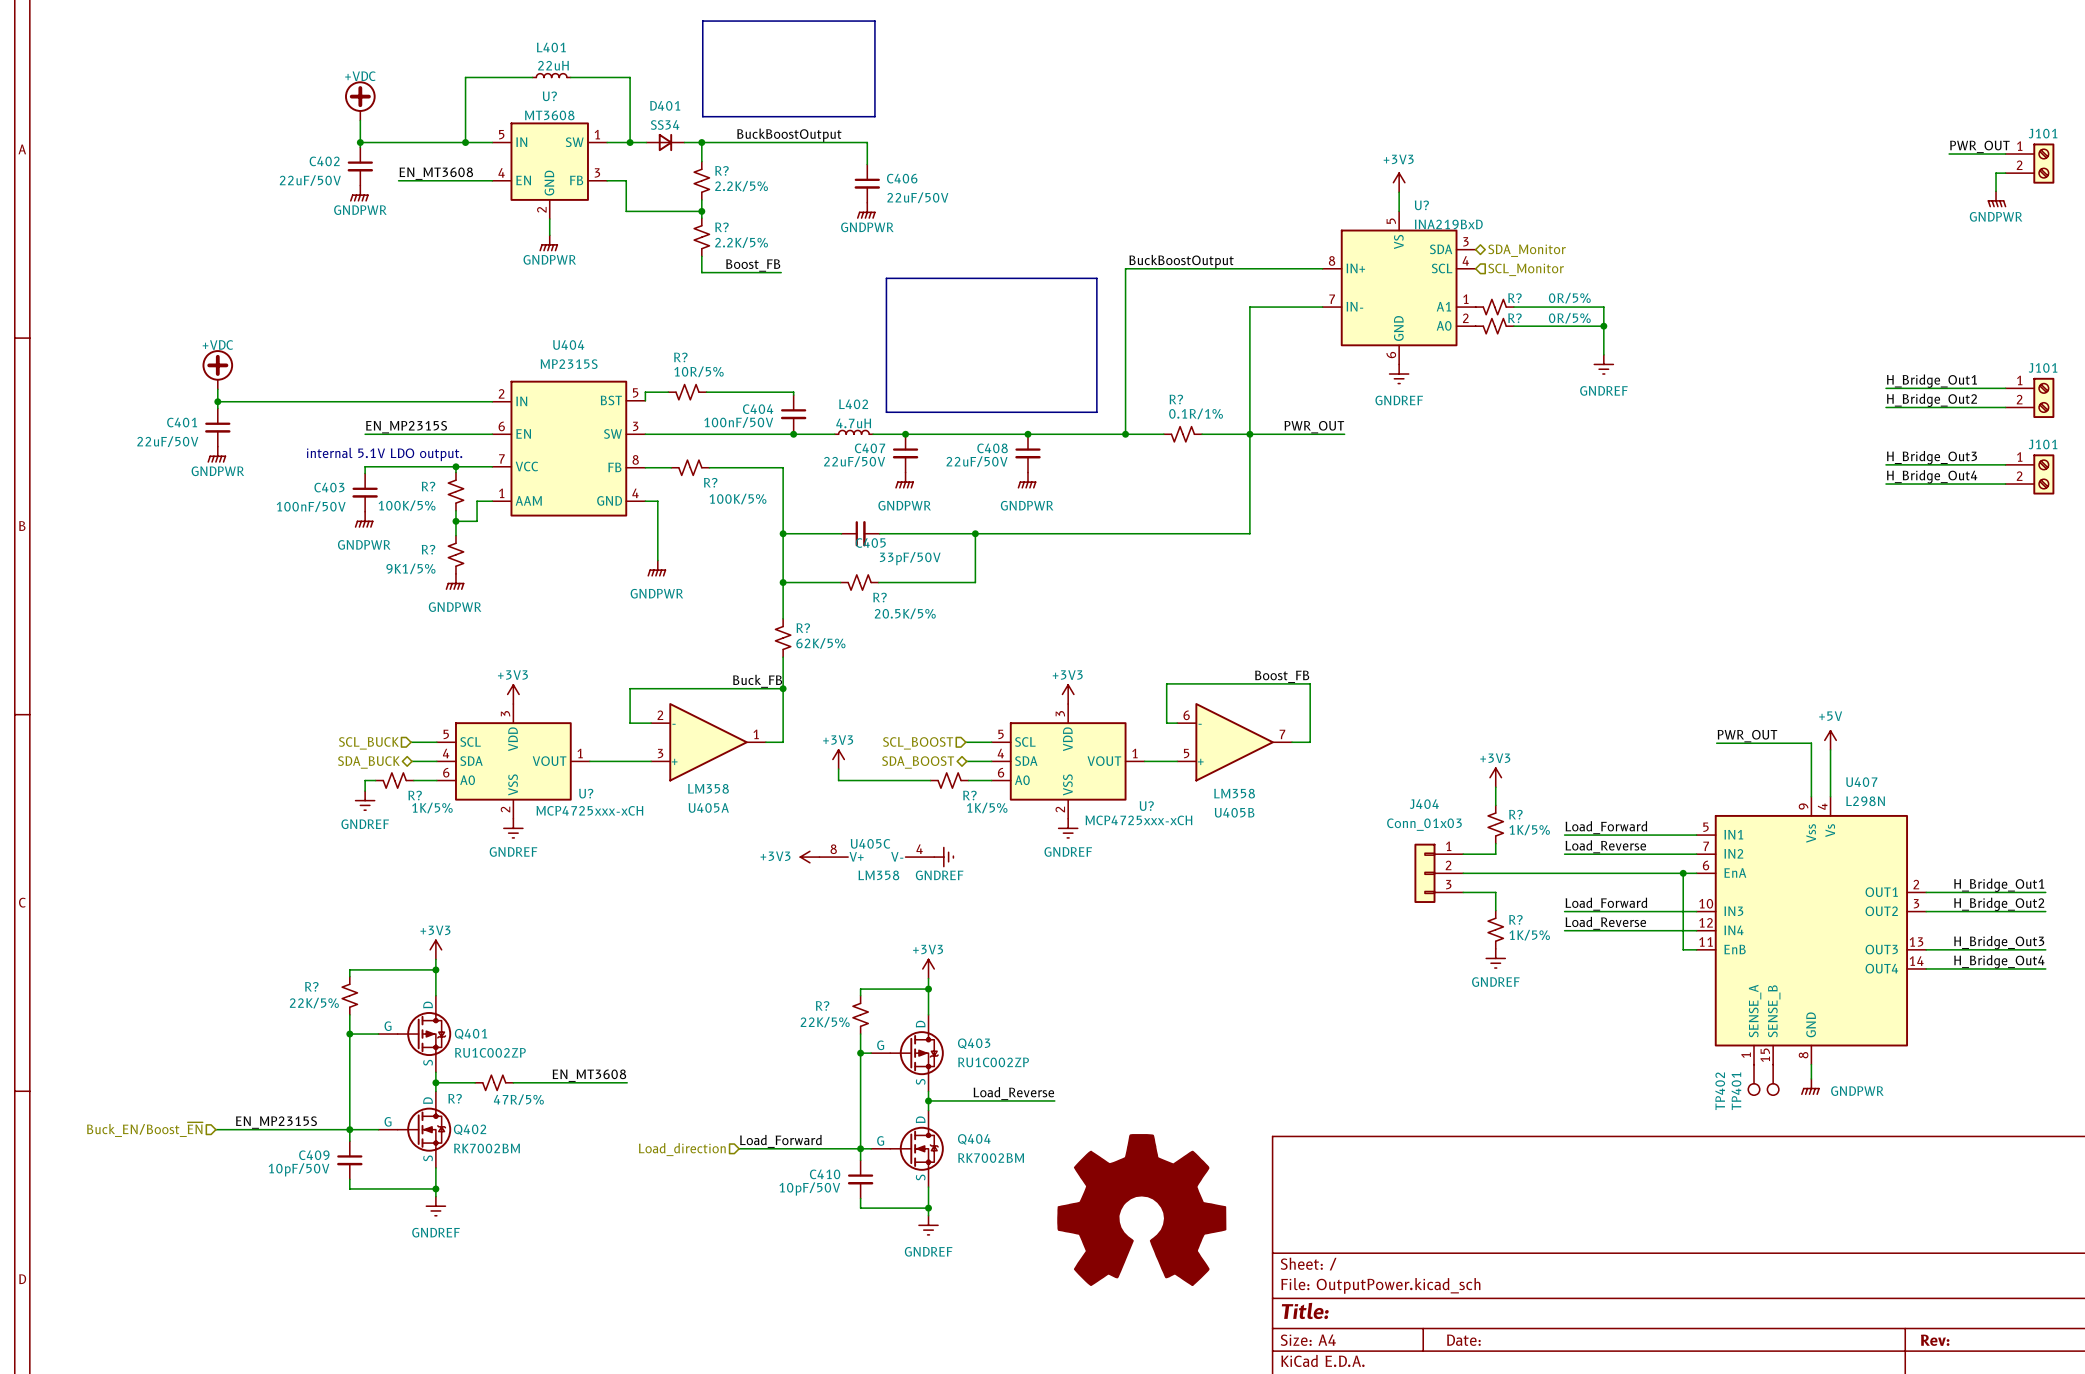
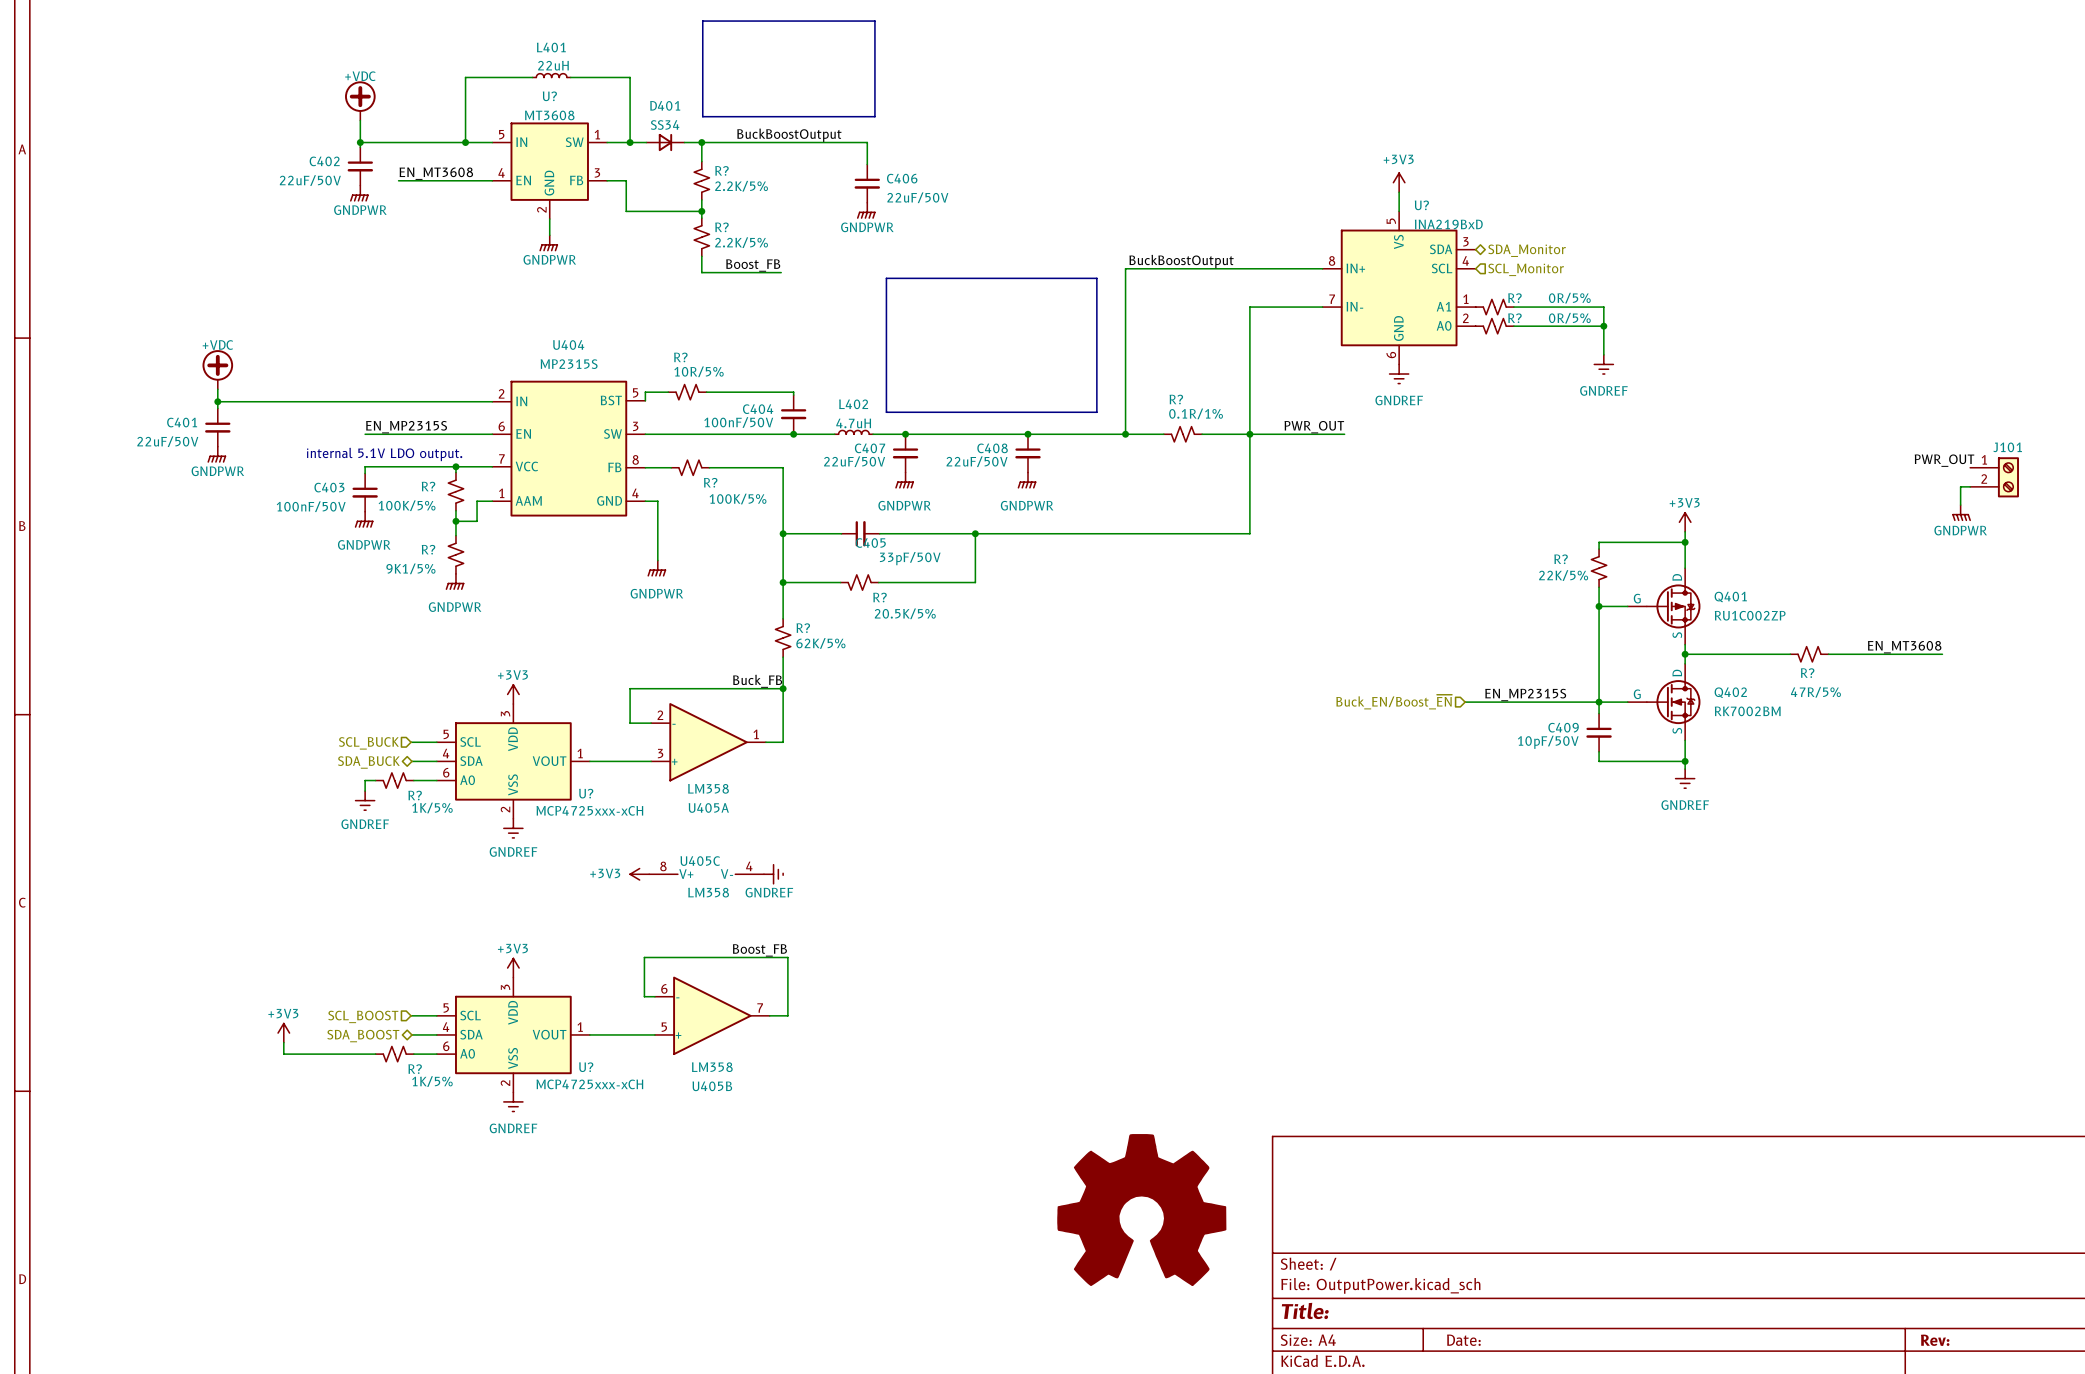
label: PWR_OUT (1979, 146) -> none
wire: (1949, 154) (2005, 154) -> none
J101: (2029, 163) -> none
wire: (2005, 173) (1996, 173) (1996, 191) -> none
power symbol: GNDPWR (1996, 199) -> none
label: H_Bridge_Out1 (1931, 381) -> none
wire: (1886, 388) (2005, 388) -> none
J101: (2029, 397) -> none
label: H_Bridge_Out2 (1931, 400) -> none
wire: (1886, 407) (2005, 407) -> none
label: H_Bridge_Out3 (1931, 457) -> none
label: none -> PWR_OUT (1944, 460)
wire: (1886, 464) (2005, 464) -> none
J101 position: (2029, 474) -> (1994, 477)
label: H_Bridge_Out4 (1932, 476) -> none
wire: (1886, 484) (2005, 484) -> none
wire: none -> (1970, 486) (1960, 486) (1960, 505)
power symbol: none -> GNDPWR (1961, 513)
power symbol: none -> +3V3 (1685, 522)
wire: none -> (1685, 531) (1685, 568)
wire: none -> (1685, 542) (1599, 542) (1599, 549)
junction: none -> (1685, 542)
R?: none -> 22K/5% (1599, 568)
wire: none -> (1599, 587) (1599, 713)
wire: none -> (1599, 606) (1627, 606)
junction: none -> (1599, 606)
wire: none -> (1685, 644) (1685, 663)
label: none -> EN_MT3608 (1904, 647)
wire: none -> (1685, 654) (1790, 654)
junction: none -> (1685, 654)
R?: none -> 47R/5% (1809, 654)
wire: none -> (1828, 654) (1942, 654)
label: Boost_FB (1282, 676) -> none
power symbol: +3V3 (1068, 694) -> none
label: none -> EN_MP2315S (1525, 694)
hierarchical label: none -> Buck_EN/Boost_~{EN} (1394, 702)
wire: none -> (1465, 702) (1627, 702)
junction: none -> (1599, 702)
wire: (1177, 723) (1166, 723) (1166, 683) (1310, 683) (1310, 742) (1292, 742) -> none
label: PWR_OUT (1747, 736) -> none
wire: none -> (1685, 740) (1685, 769)
power symbol: +5V (1830, 740) -> none
wire: (965, 742) (991, 742) -> none
U405B position: (1234, 742) -> (712, 1015)
hierarchical label: SCL_BOOST (918, 743) -> none
wire: (1716, 743) (1811, 743) (1811, 796) -> none
wire: (1830, 749) (1830, 796) -> none
wire: none -> (1599, 751) (1599, 761) (1685, 761)
power symbol: +3V3 (838, 759) -> none
wire: (966, 761) (991, 761) -> none
U?: MCP4725xxx-xCH (1068, 761) -> none
wire: (1144, 761) (1177, 761) -> none
junction: none -> (1685, 761)
hierarchical label: SDA_BOOST (918, 762) -> none
wire: (838, 769) (838, 780) (930, 780) -> none
power symbol: +3V3 (1495, 777) -> none
power symbol: none -> GNDREF (1685, 778)
R?: 1K/5% (949, 780) -> none
wire: (968, 780) (991, 780) -> none
wire: (1495, 787) (1495, 805) -> none
R?: 1K/5% (1495, 824) -> none
label: Load_Forward (1606, 827) -> none
power symbol: GNDREF (1068, 828) -> none
wire: (1564, 835) (1696, 835) -> none
wire: (1495, 843) (1495, 854) (1463, 854) -> none
label: Load_Reverse (1605, 846) -> none
wire: (1564, 854) (1696, 854) -> none
power symbol: +3V3 (809, 857) -> none
U405C position: (876, 857) -> (706, 874)
power symbol: GNDREF (943, 857) -> none
J404: Conn_01x03 (1438, 873) -> none
wire: (1463, 873) (1696, 873) -> none
wire: (1683, 873) (1683, 949) (1696, 949) -> none
junction: (1683, 873) -> none
power symbol: none -> +3V3 (639, 874)
power symbol: none -> GNDREF (773, 874)
label: H_Bridge_Out1 (1999, 885) -> none
wire: (1463, 892) (1495, 892) (1495, 910) -> none
wire: (1926, 892) (2045, 892) -> none
label: Load_Forward (1606, 904) -> none
label: H_Bridge_Out2 (1999, 904) -> none
wire: (1564, 911) (1696, 911) -> none
wire: (1926, 911) (2045, 911) -> none
label: Load_Reverse (1605, 923) -> none
R?: 1K/5% (1495, 929) -> none
wire: (1564, 930) (1696, 930) -> none
U407: L298N (1811, 930) -> none
label: H_Bridge_Out3 (1999, 942) -> none
power symbol position: +3V3 (435, 949) -> +3V3 (513, 968)
wire: (1926, 949) (2045, 949) -> none
label: none -> Boost_FB (759, 950)
power symbol: GNDREF (1495, 958) -> none
wire: (435, 959) (435, 995) -> none
label: H_Bridge_Out4 (1999, 961) -> none
power symbol: +3V3 (928, 968) -> none
wire: (1926, 968) (2045, 968) -> none
wire: (435, 969) (349, 969) (349, 976) -> none
junction: (435, 969) -> none
wire: (928, 978) (928, 1014) -> none
wire: (928, 989) (860, 989) (860, 995) -> none
junction: (928, 989) -> none
R?: 22K/5% (349, 995) -> none
wire: none -> (654, 996) (644, 996) (644, 957) (787, 957) (787, 1015) (769, 1015)
wire: (349, 1014) (349, 1141) -> none
R?: 22K/5% (860, 1014) -> none
wire: none -> (411, 1015) (436, 1015)
hierarchical label: none -> SCL_BOOST (363, 1016)
power symbol: none -> +3V3 (283, 1033)
wire: (349, 1034) (378, 1034) -> none
junction: (349, 1034) -> none
Q401 position: (414, 1034) -> (1664, 606)
Q401 name position: Q401 (470, 1034) -> Q401 (1730, 596)
U?: none -> MCP4725xxx-xCH (513, 1034)
wire: none -> (589, 1034) (654, 1034)
wire: (860, 1034) (860, 1160) -> none
hierarchical label: none -> SDA_BOOST (363, 1036)
wire: none -> (283, 1042) (283, 1054) (375, 1054)
Q401 value position: RU1C002ZP (490, 1052) -> RU1C002ZP (1750, 615)
wire: (860, 1053) (871, 1053) -> none
junction: (860, 1053) -> none
Q403: RU1C002ZP (907, 1053) -> none
R?: none -> 1K/5% (394, 1054)
wire: (1811, 1064) (1811, 1078) -> none
wire: (435, 1072) (435, 1091) -> none
label: EN_MT3608 (589, 1075) -> none
TP402: (1754, 1079) -> none
TP401: (1773, 1079) -> none
wire: (435, 1082) (475, 1082) -> none
junction: (435, 1082) -> none
R?: 47R/5% (494, 1082) -> none
wire: (513, 1082) (627, 1082) -> none
power symbol: GNDPWR (1810, 1087) -> none
wire: (928, 1091) (928, 1110) -> none
label: Load_Reverse (1013, 1093) -> none
wire: (928, 1100) (1054, 1100) -> none
junction: (928, 1100) -> none
label: EN_MP2315S (276, 1122) -> none
hierarchical label: Buck_EN/Boost_~{EN} (144, 1129) -> none
wire: (215, 1129) (378, 1129) -> none
junction: (349, 1129) -> none
Q402 position: (414, 1129) -> (1664, 702)
Q402 name position: Q402 (470, 1129) -> Q402 (1730, 692)
label: Load_Forward (780, 1141) -> none
Q402 value position: RK7002BM (486, 1148) -> RK7002BM (1747, 711)
wire: (739, 1148) (871, 1148) -> none
junction: (860, 1148) -> none
Q404: RK7002BM (907, 1148) -> none
hierarchical label: Load_direction (682, 1149) -> none
C409 position: (349, 1160) -> (1599, 732)
wire: (435, 1167) (435, 1196) -> none
wire: (349, 1179) (349, 1188) (435, 1188) -> none
C410: 10pF/50V (860, 1179) -> none
wire: (928, 1187) (928, 1215) -> none
junction: (435, 1188) -> none
wire: (860, 1198) (860, 1208) (928, 1208) -> none
power symbol position: GNDREF (435, 1206) -> GNDREF (513, 1101)
junction: (928, 1208) -> none
power symbol: GNDREF (928, 1225) -> none

